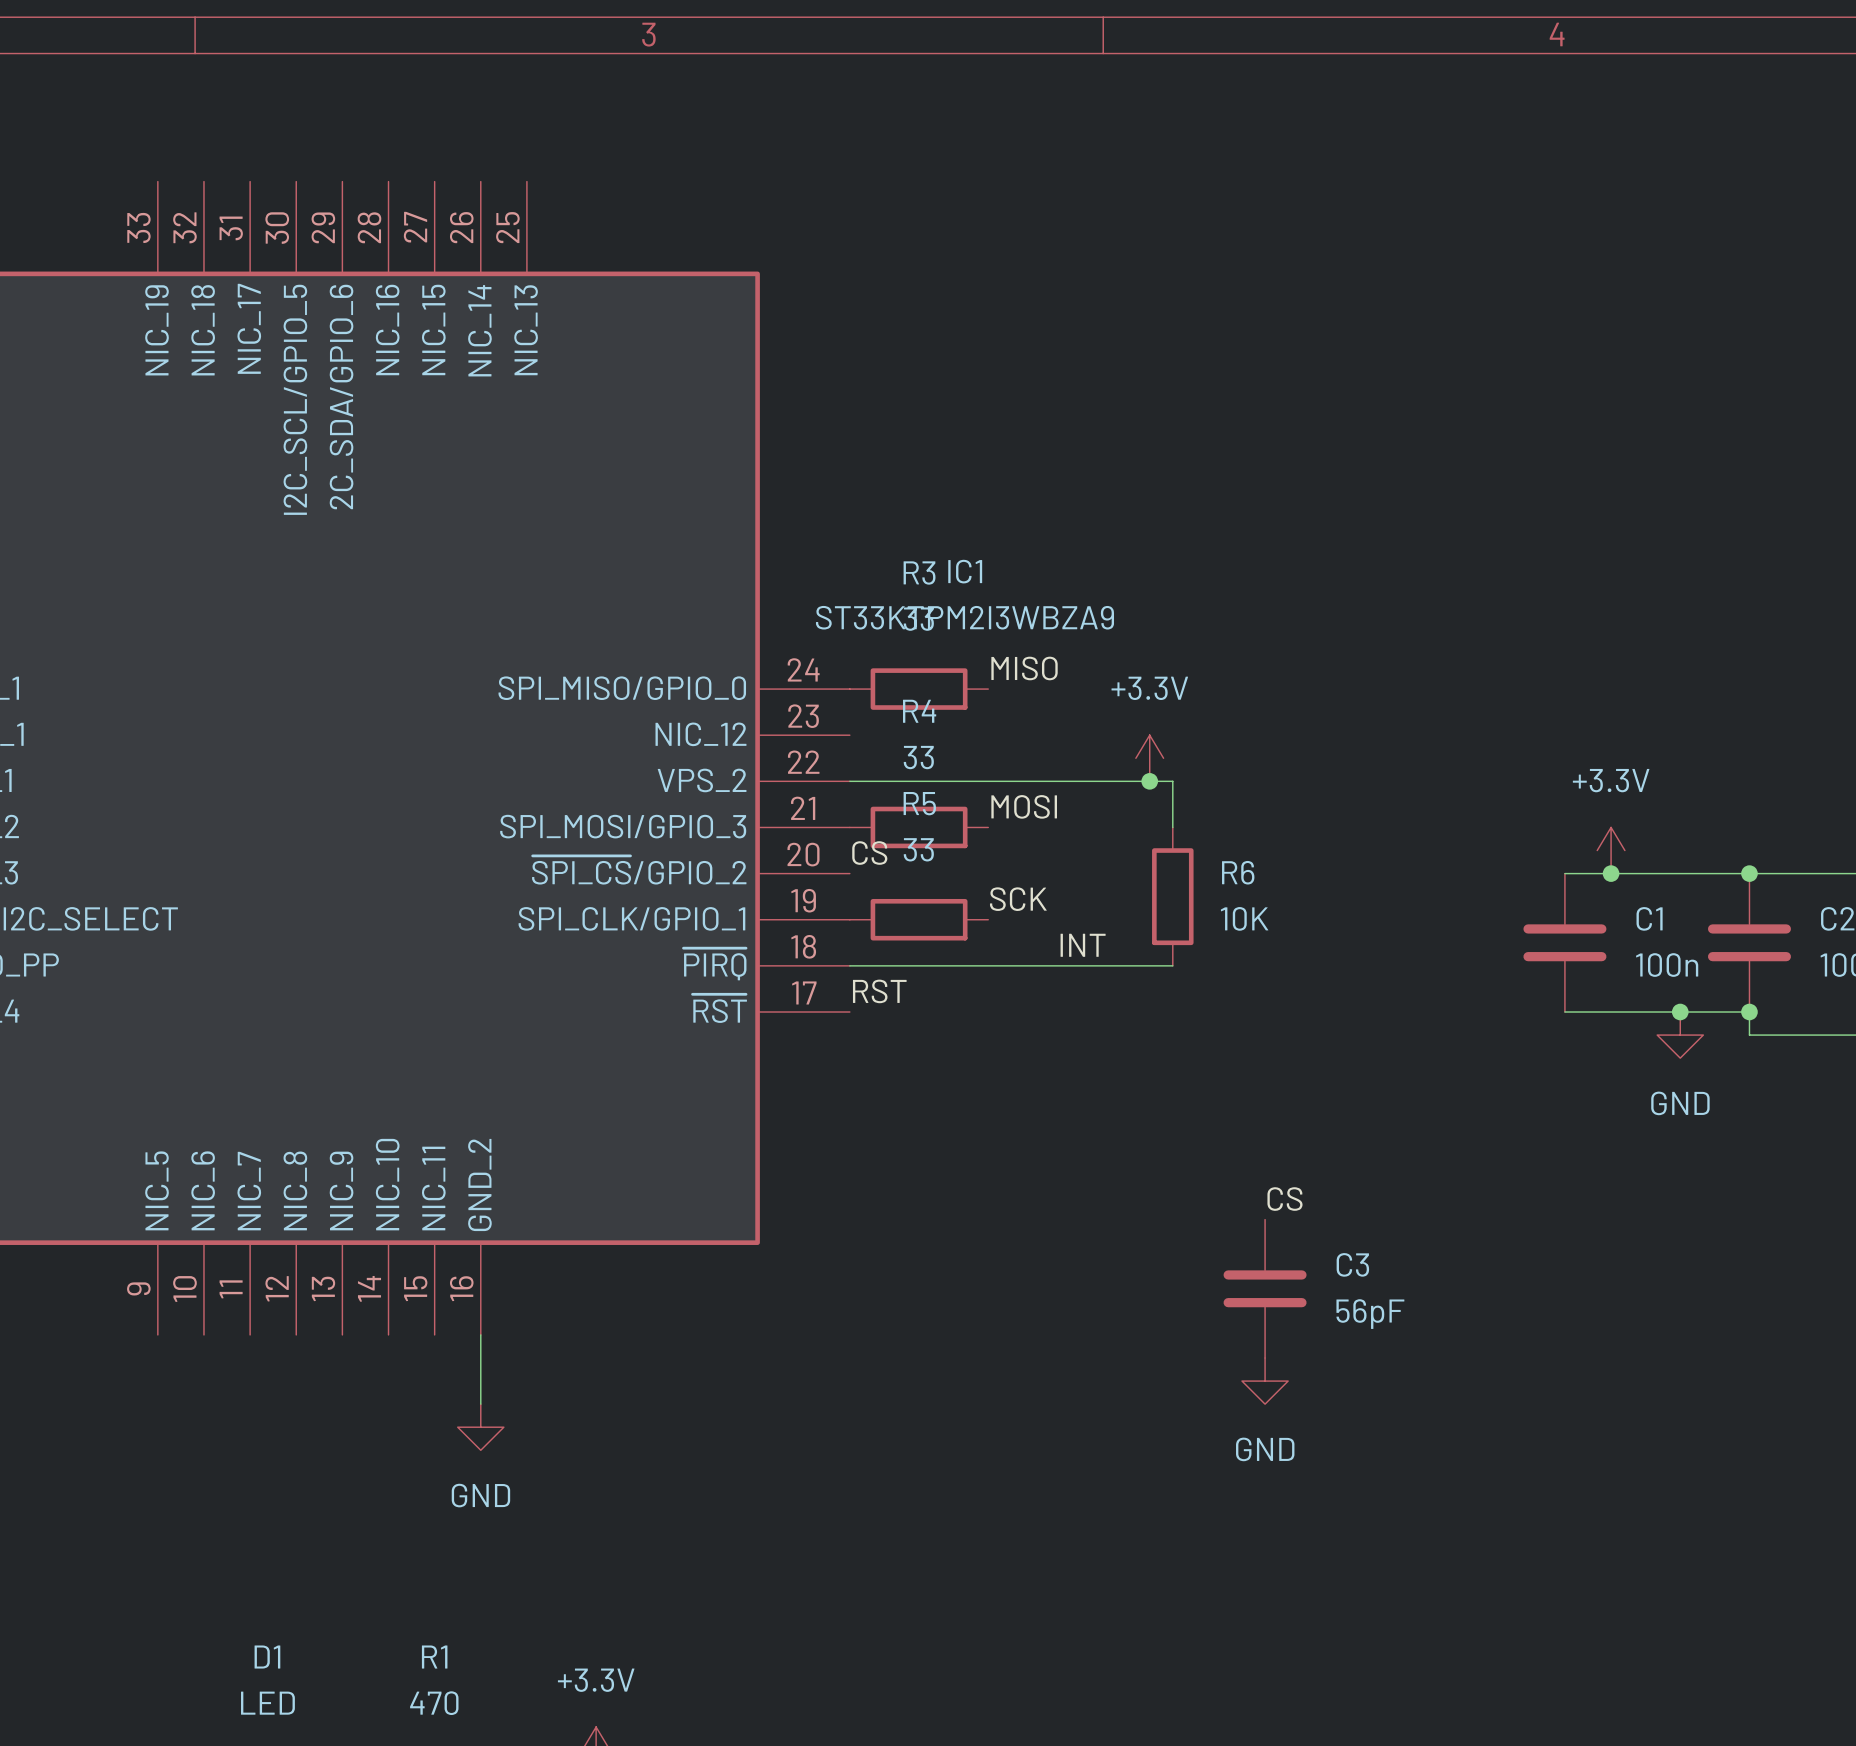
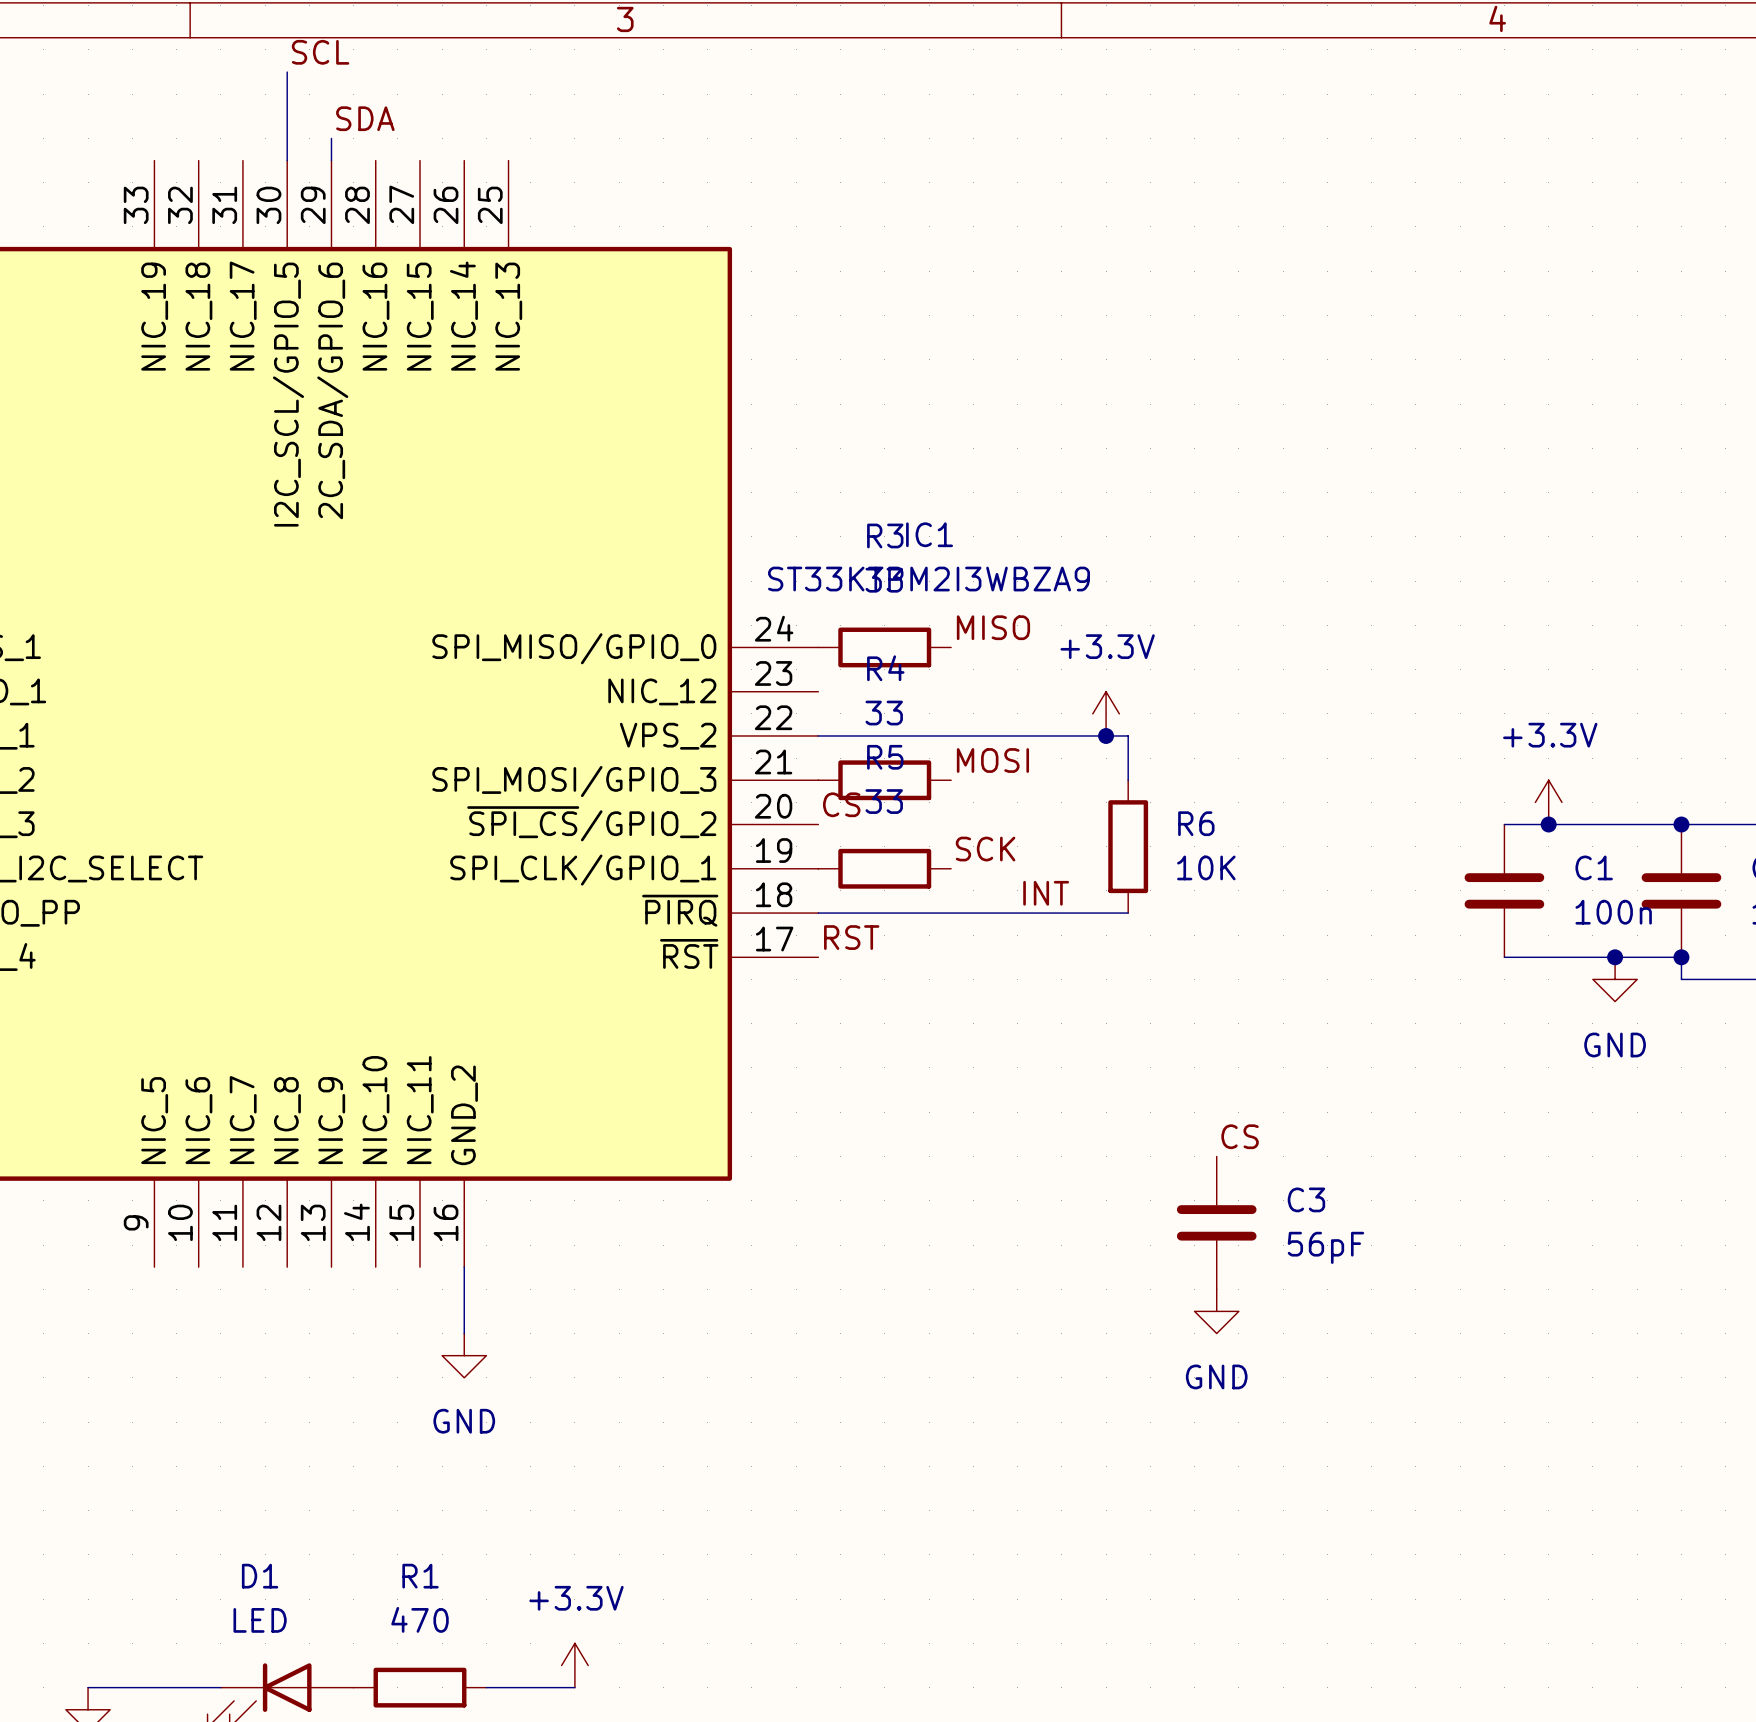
label: none -> SCL (320, 52)
wire: none -> (287, 72) (287, 160)
label: none -> SDA (365, 118)
wire: none -> (331, 138) (331, 160)

